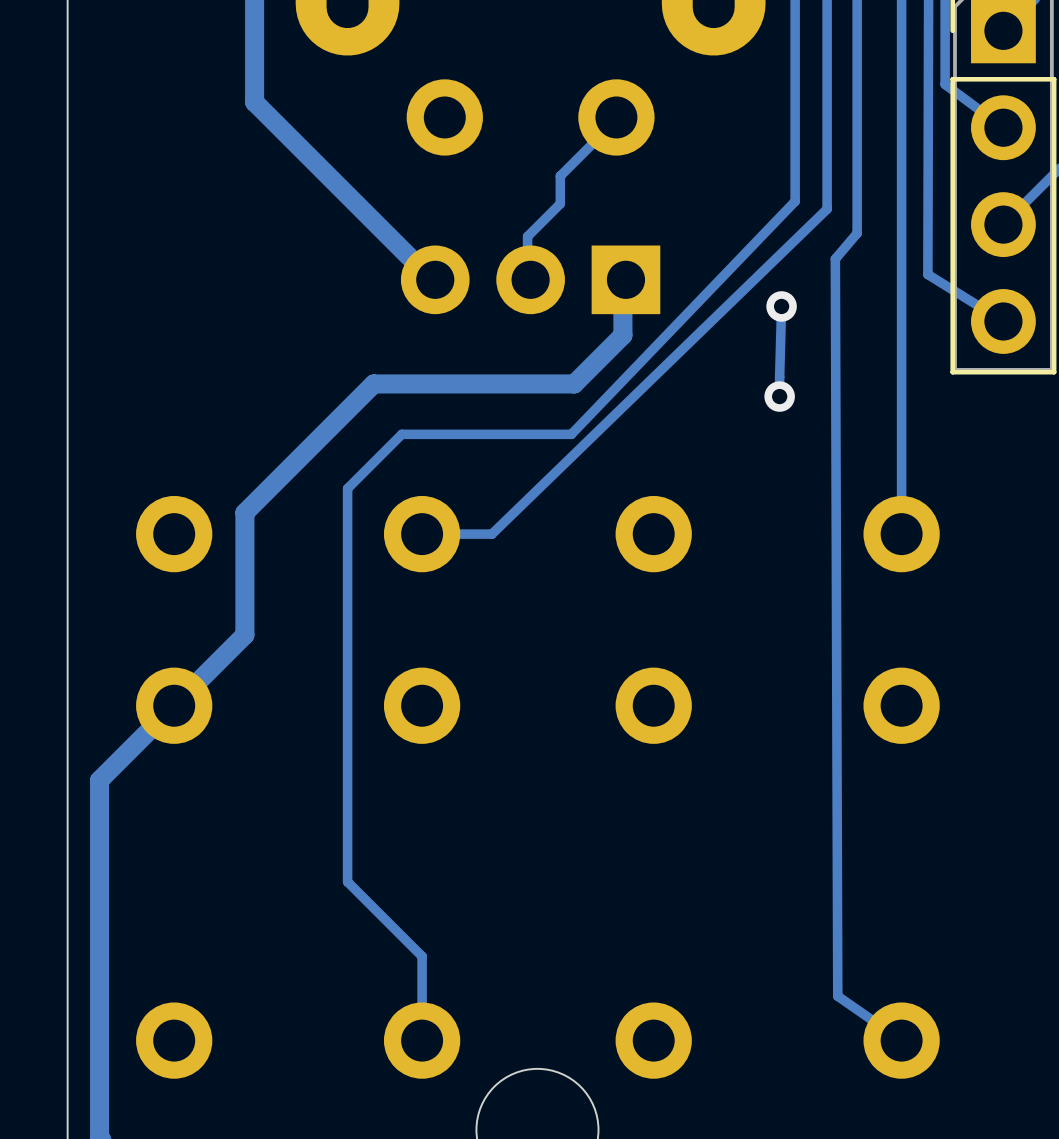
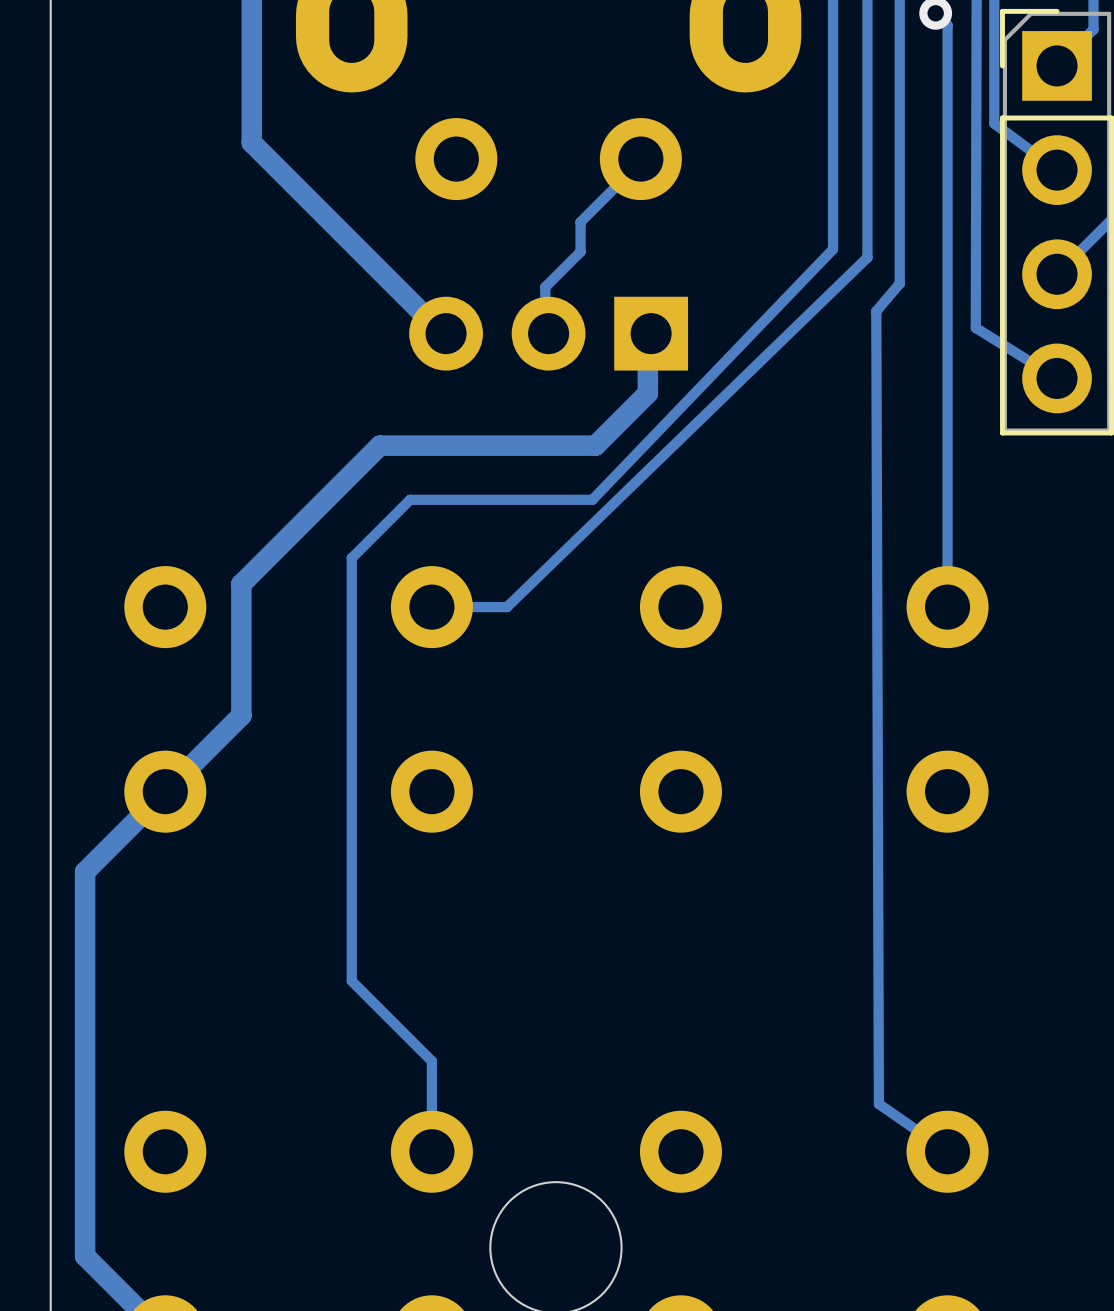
track: (781, 306) (779, 396) -> none
via: (781, 306) -> none
via: (779, 396) -> none

